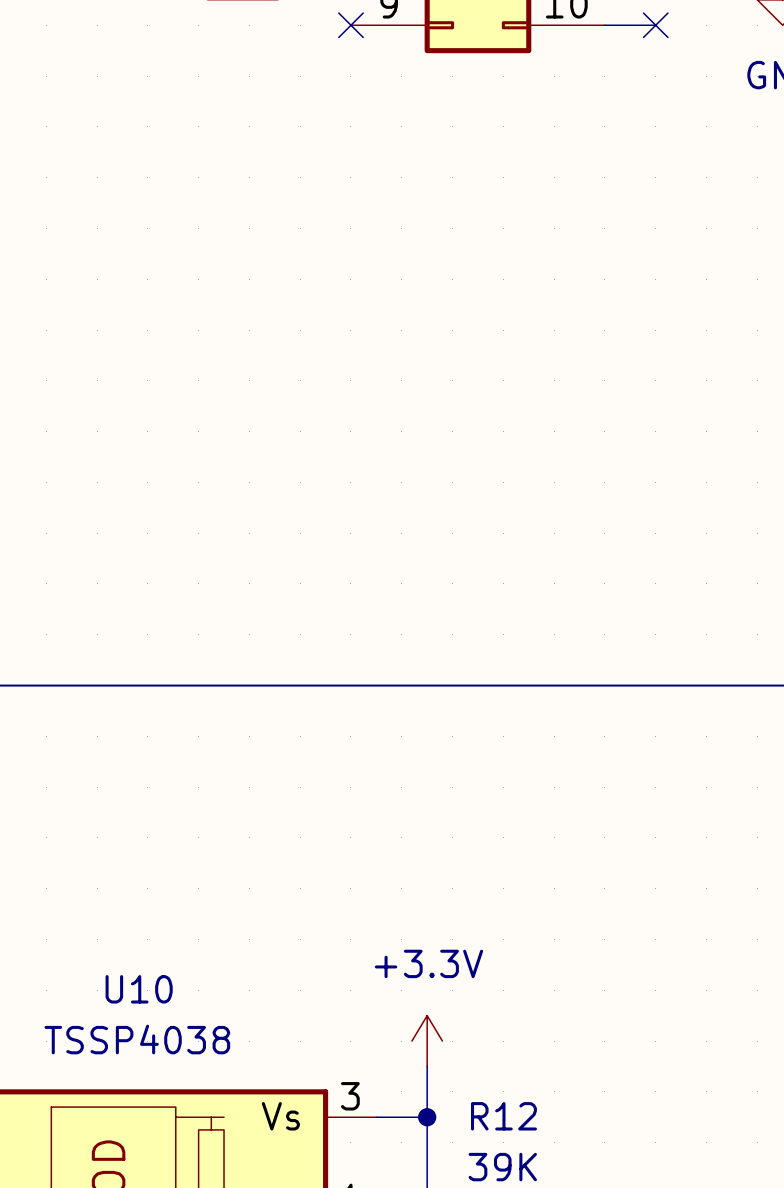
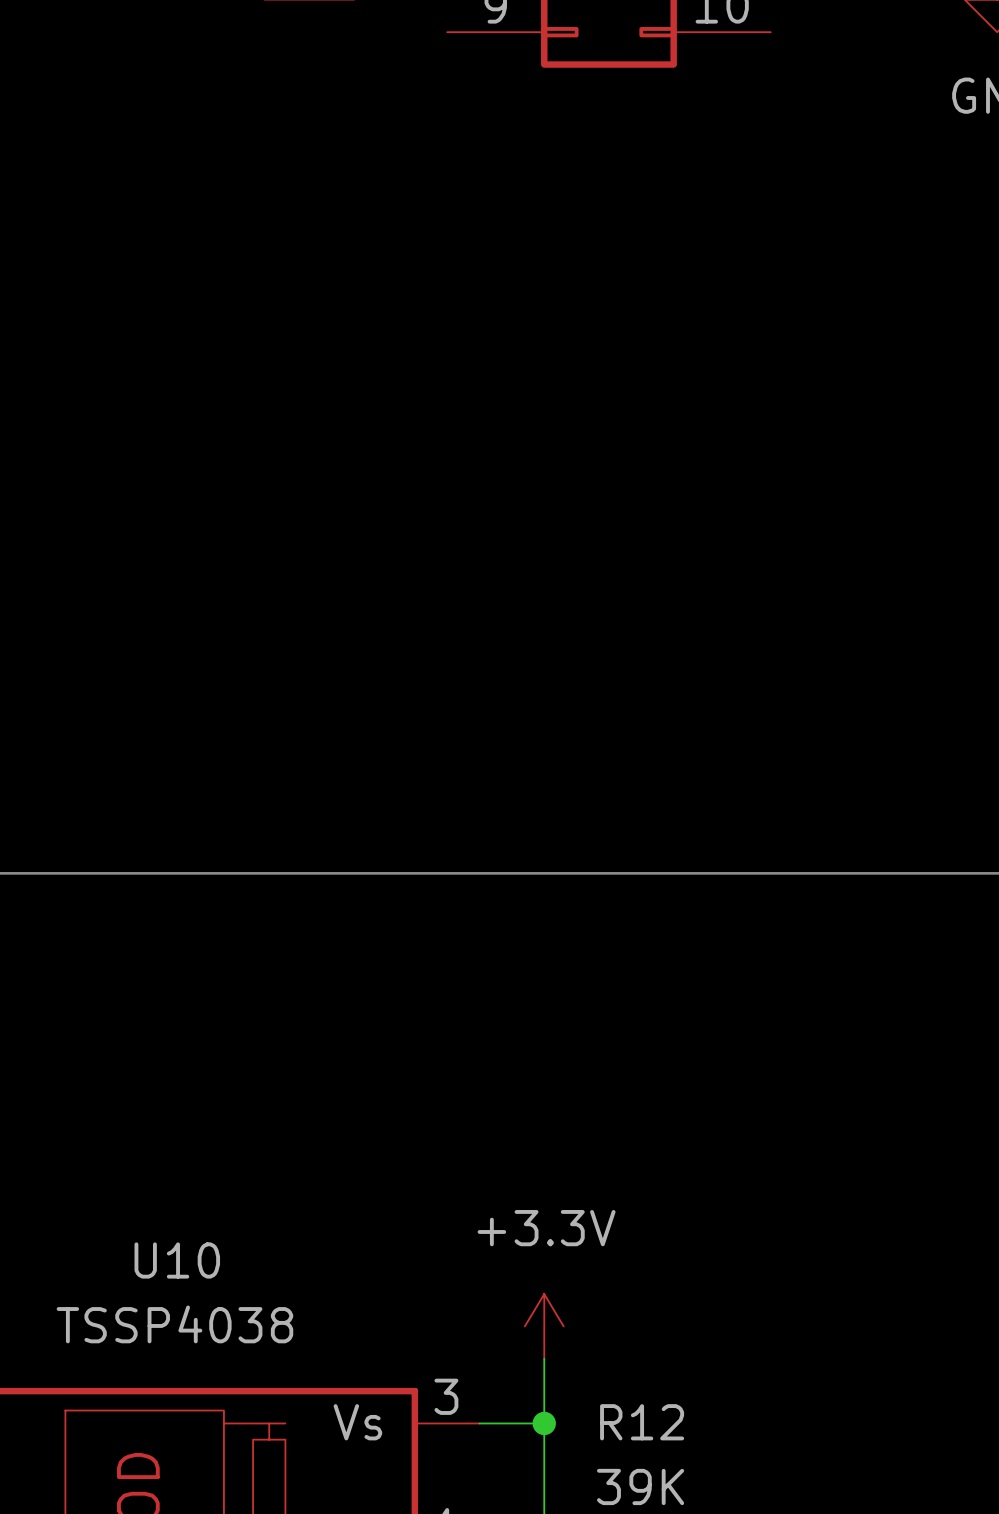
no-connect mark: (350, 25) -> none
wire: (604, 25) (655, 25) -> none
no-connect mark: (655, 25) -> none

